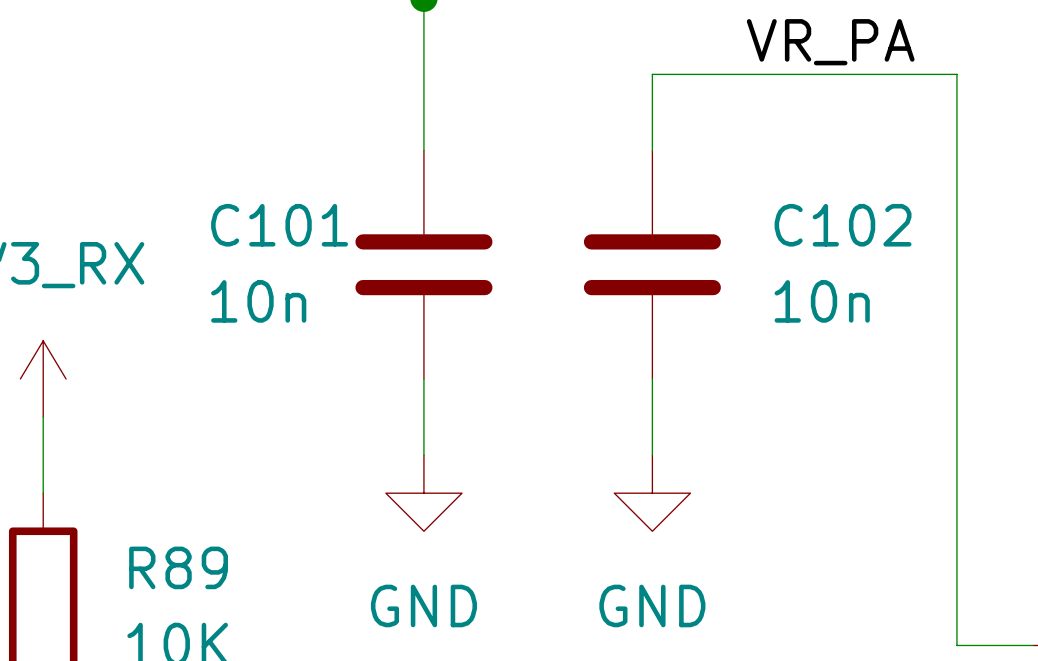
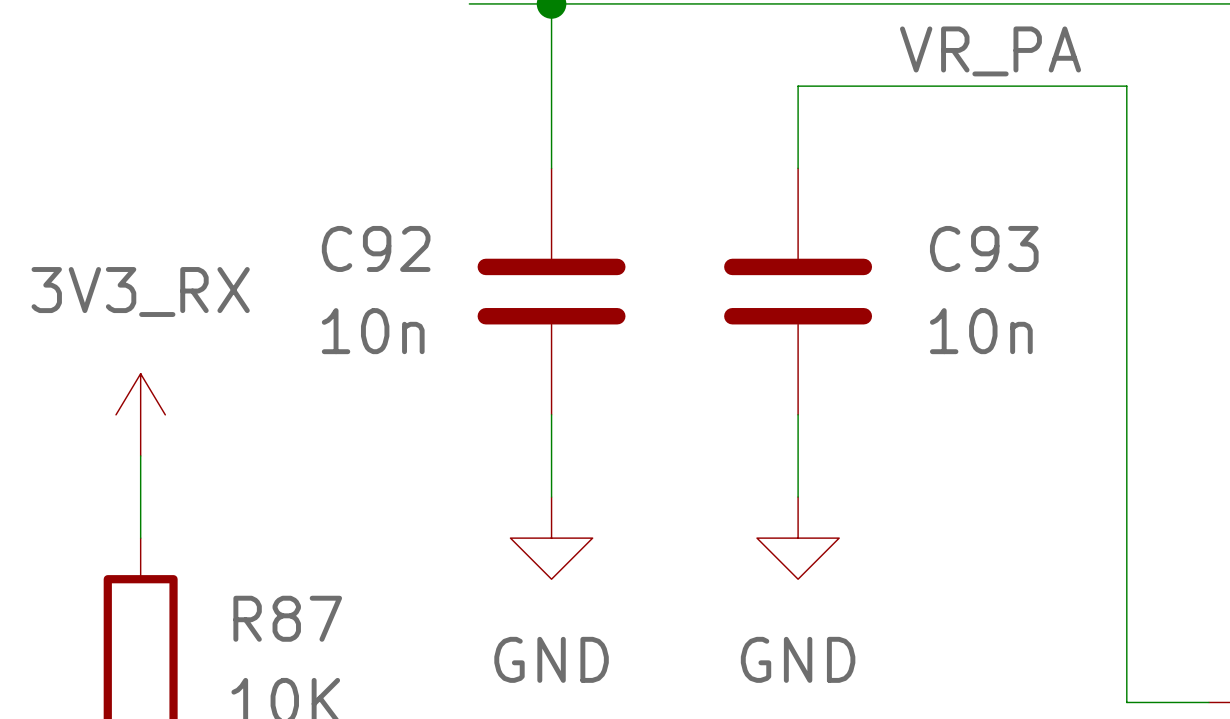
C101 name: C101 (279, 225) -> C92 (376, 248)
C102 name: C102 (843, 225) -> C93 (984, 248)
R89 name: R89 (178, 567) -> R87 (287, 618)

